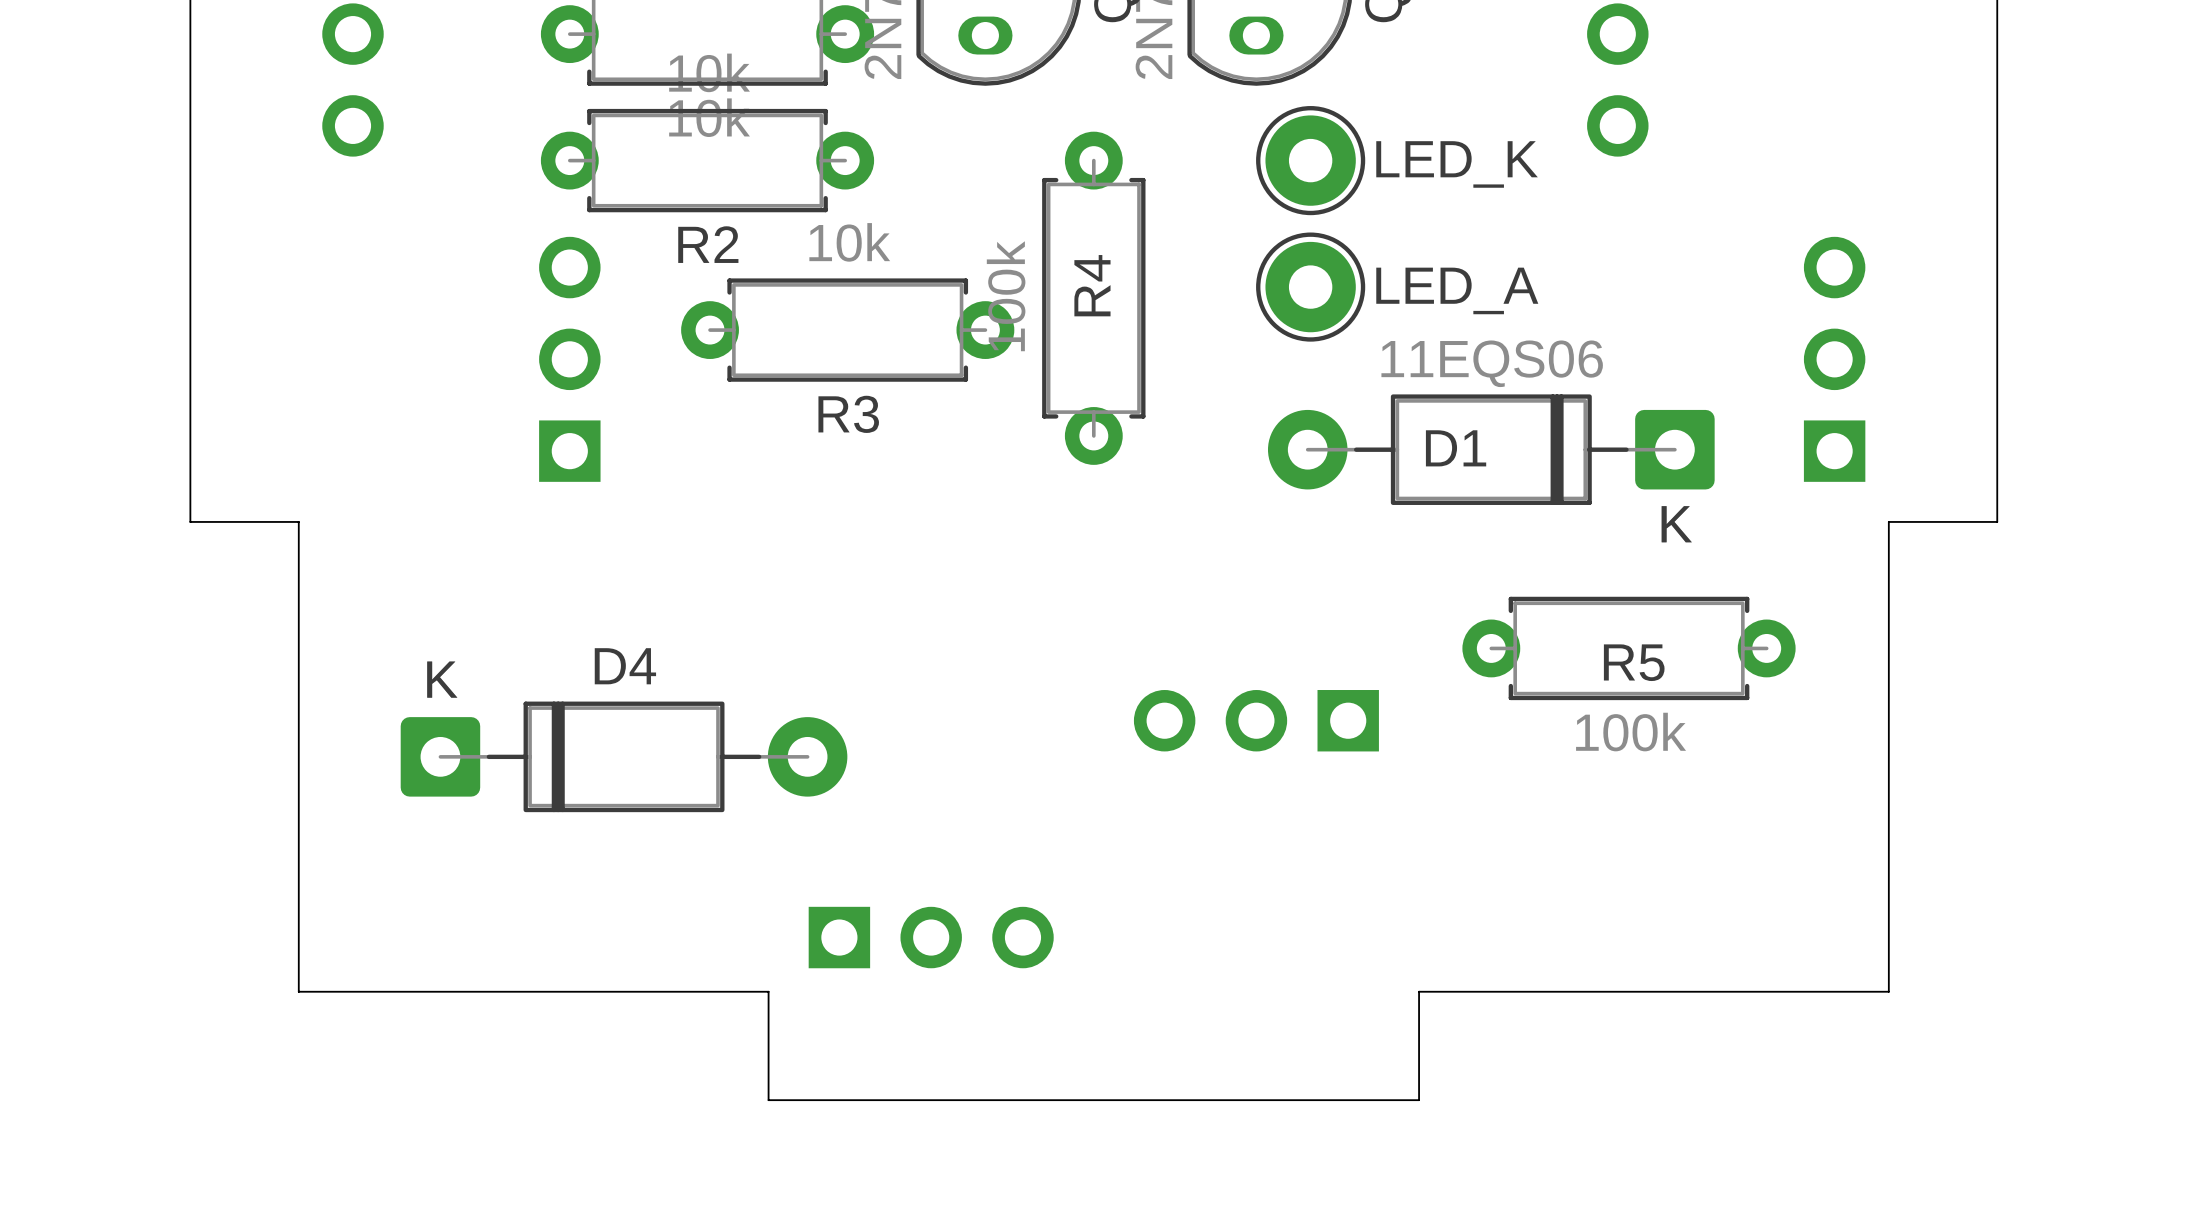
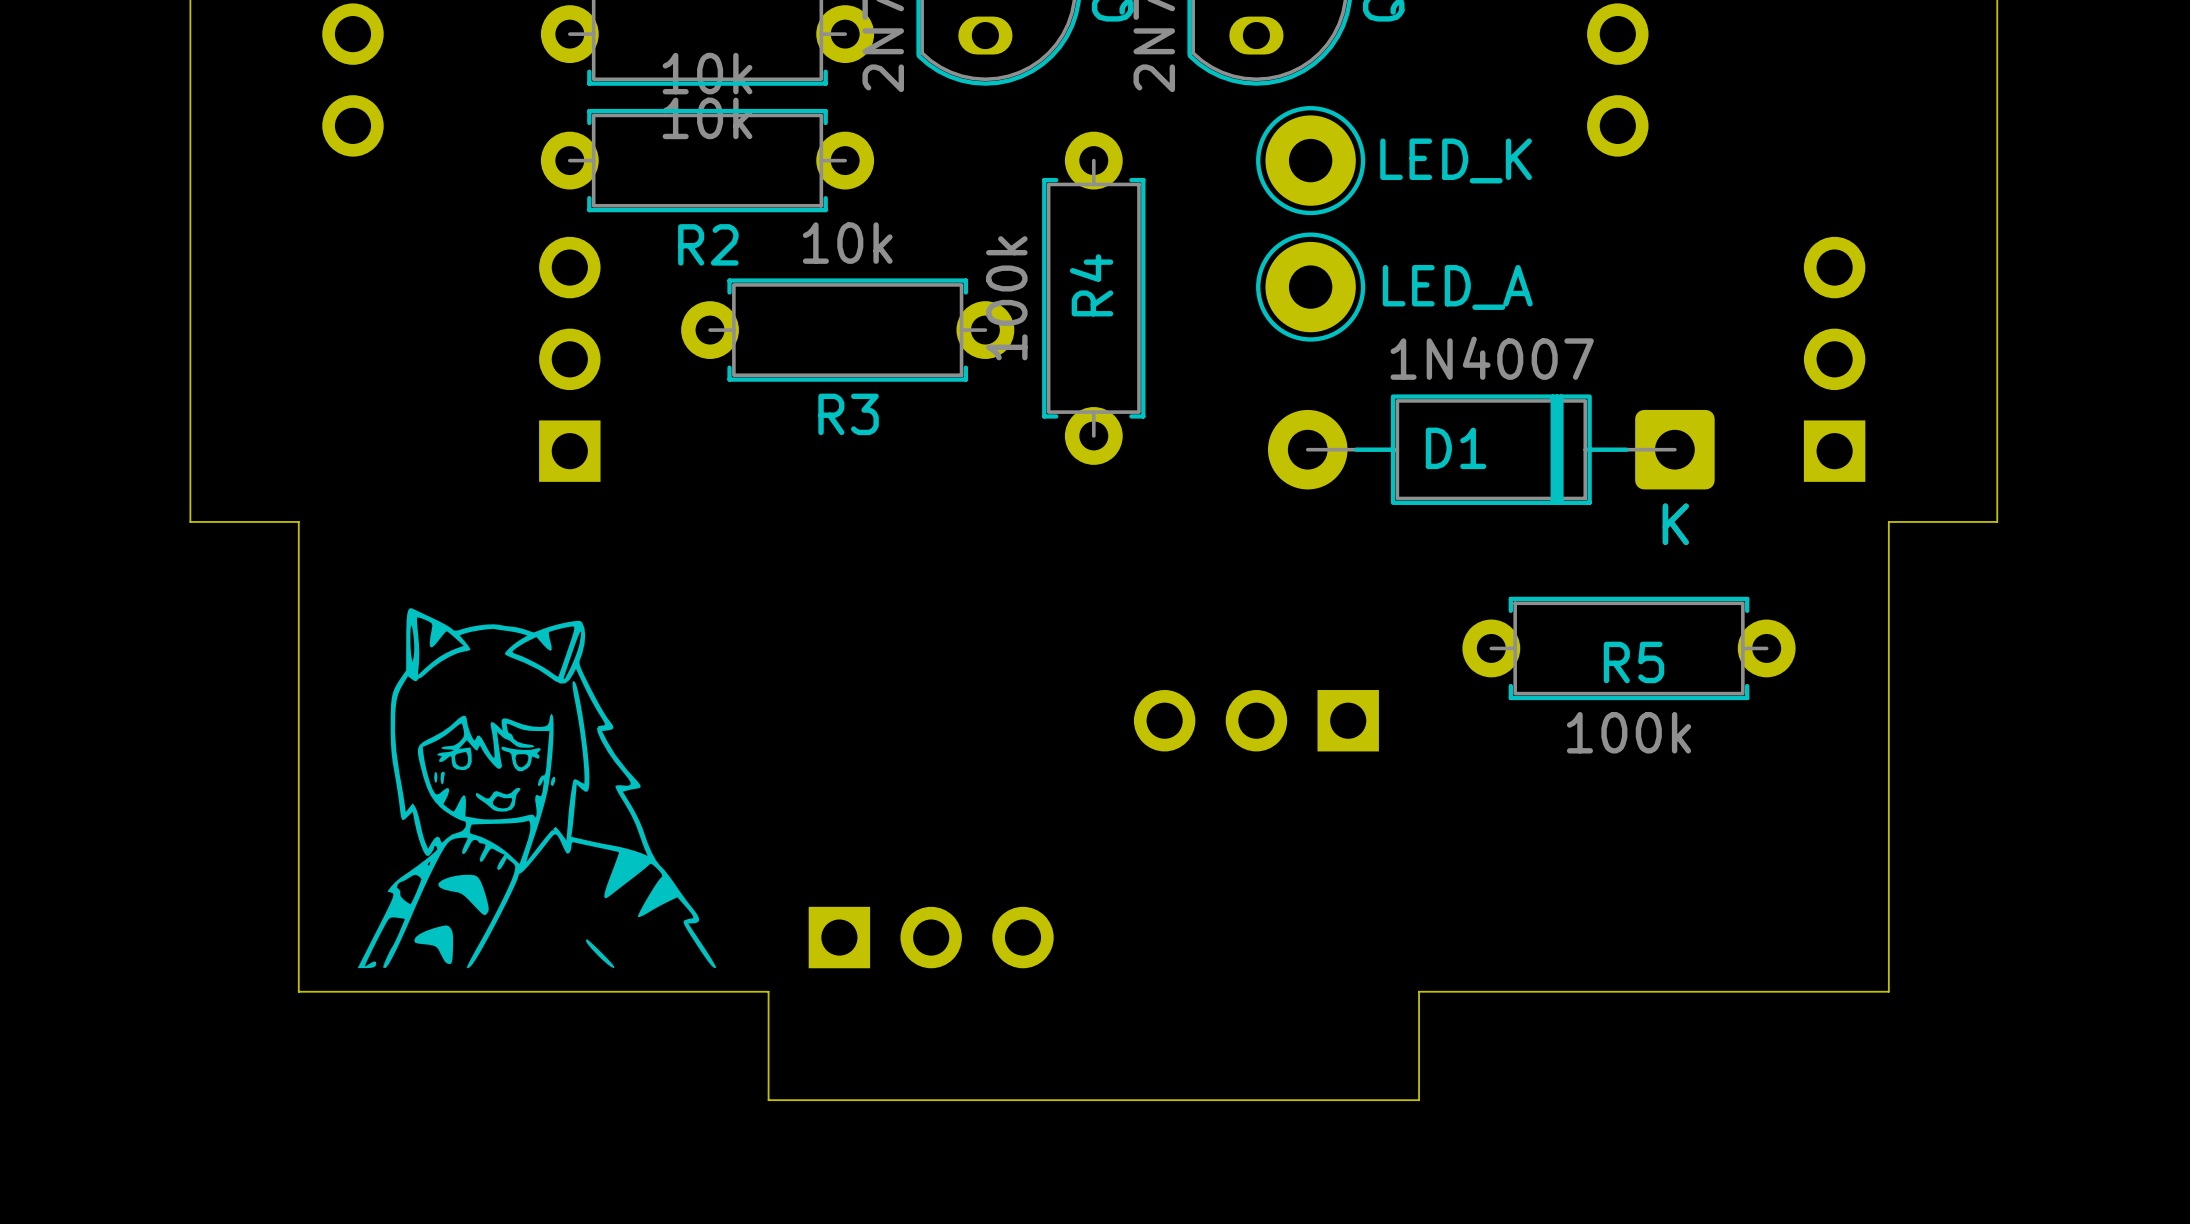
D1 value: 11EQS06 (1492, 363) -> 1N4007 (1492, 358)
drawing: none -> [357, 608, 717, 969]
D4: (624, 756) -> none

